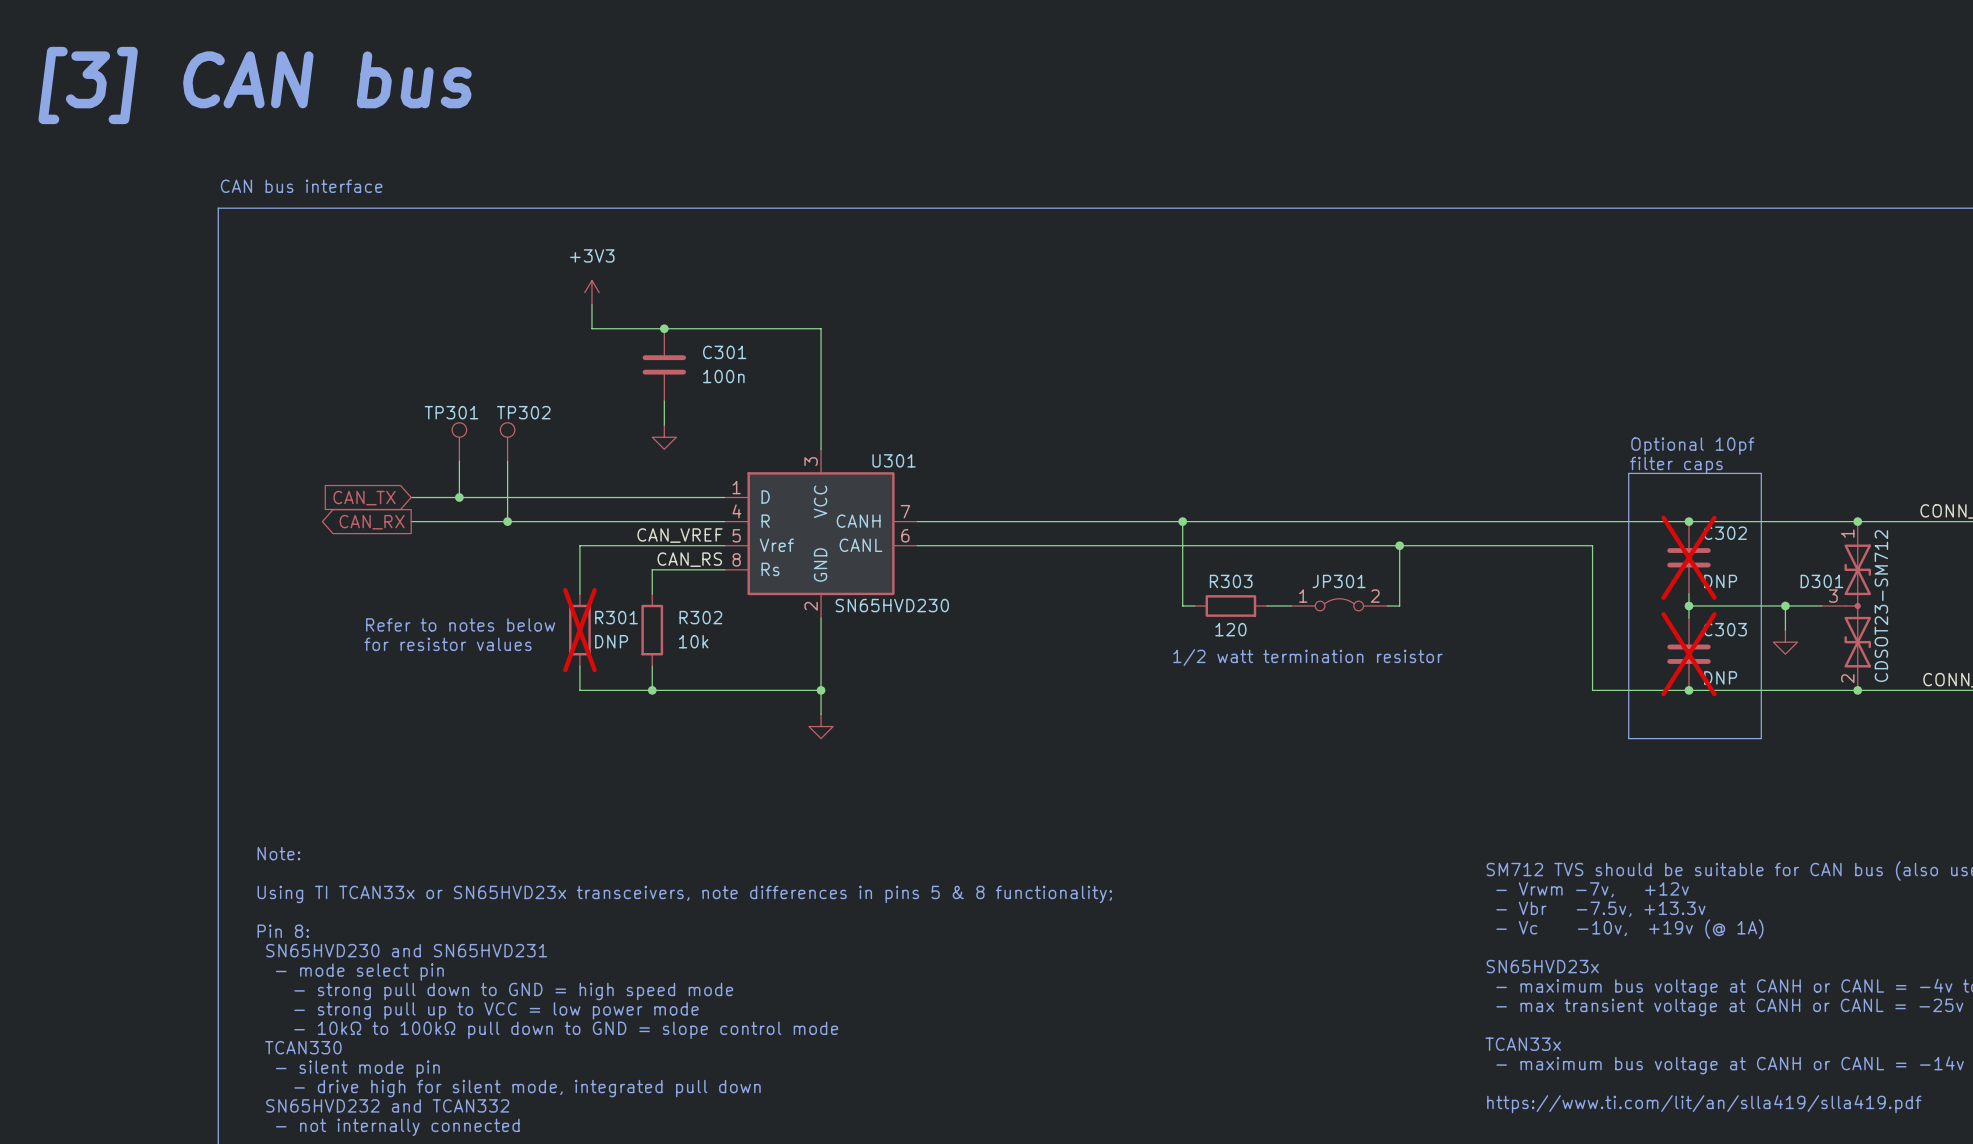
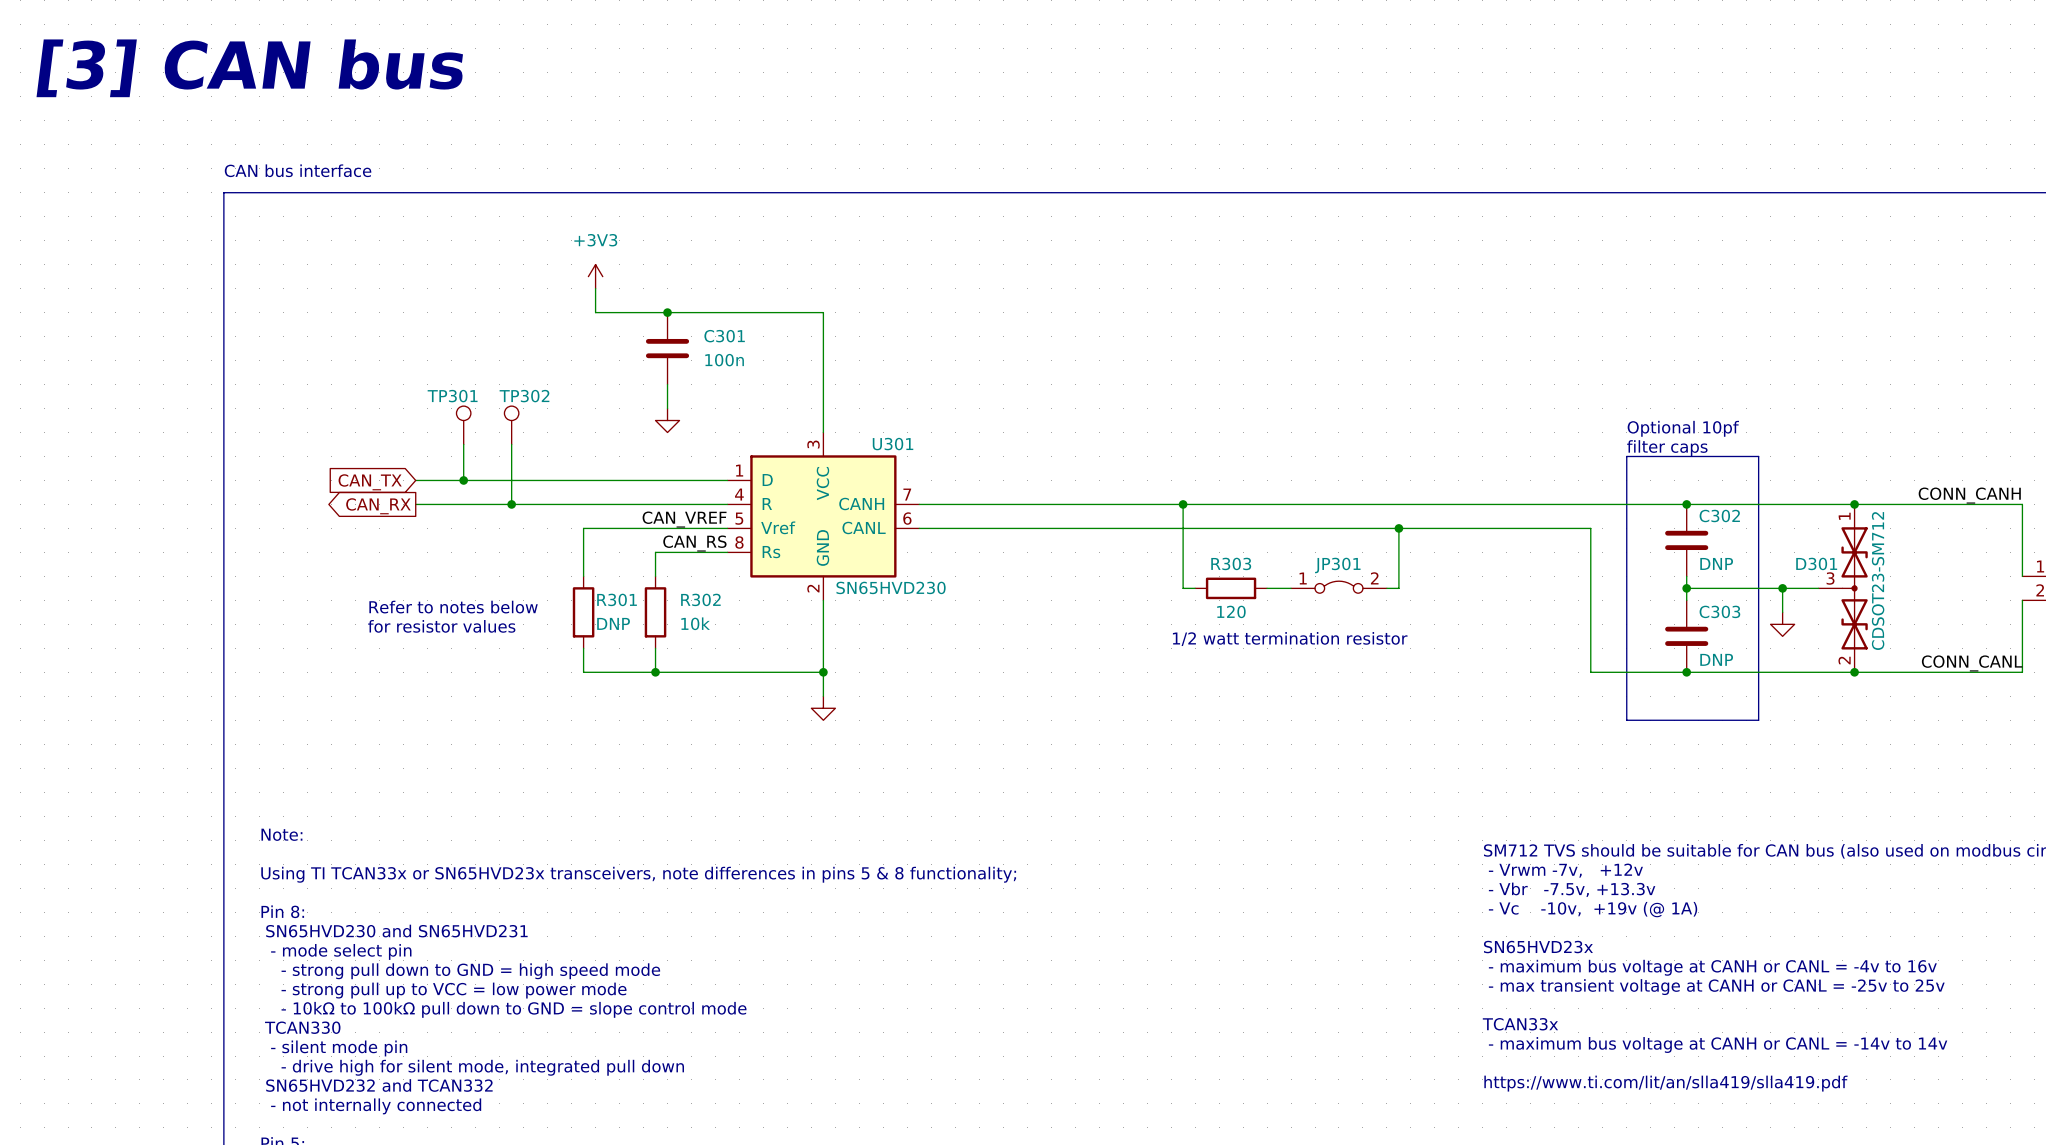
C302 do-not-place cross: (1688, 557) -> none
R301 do-not-place cross: (579, 630) -> none
C303 do-not-place cross: (1688, 654) -> none

